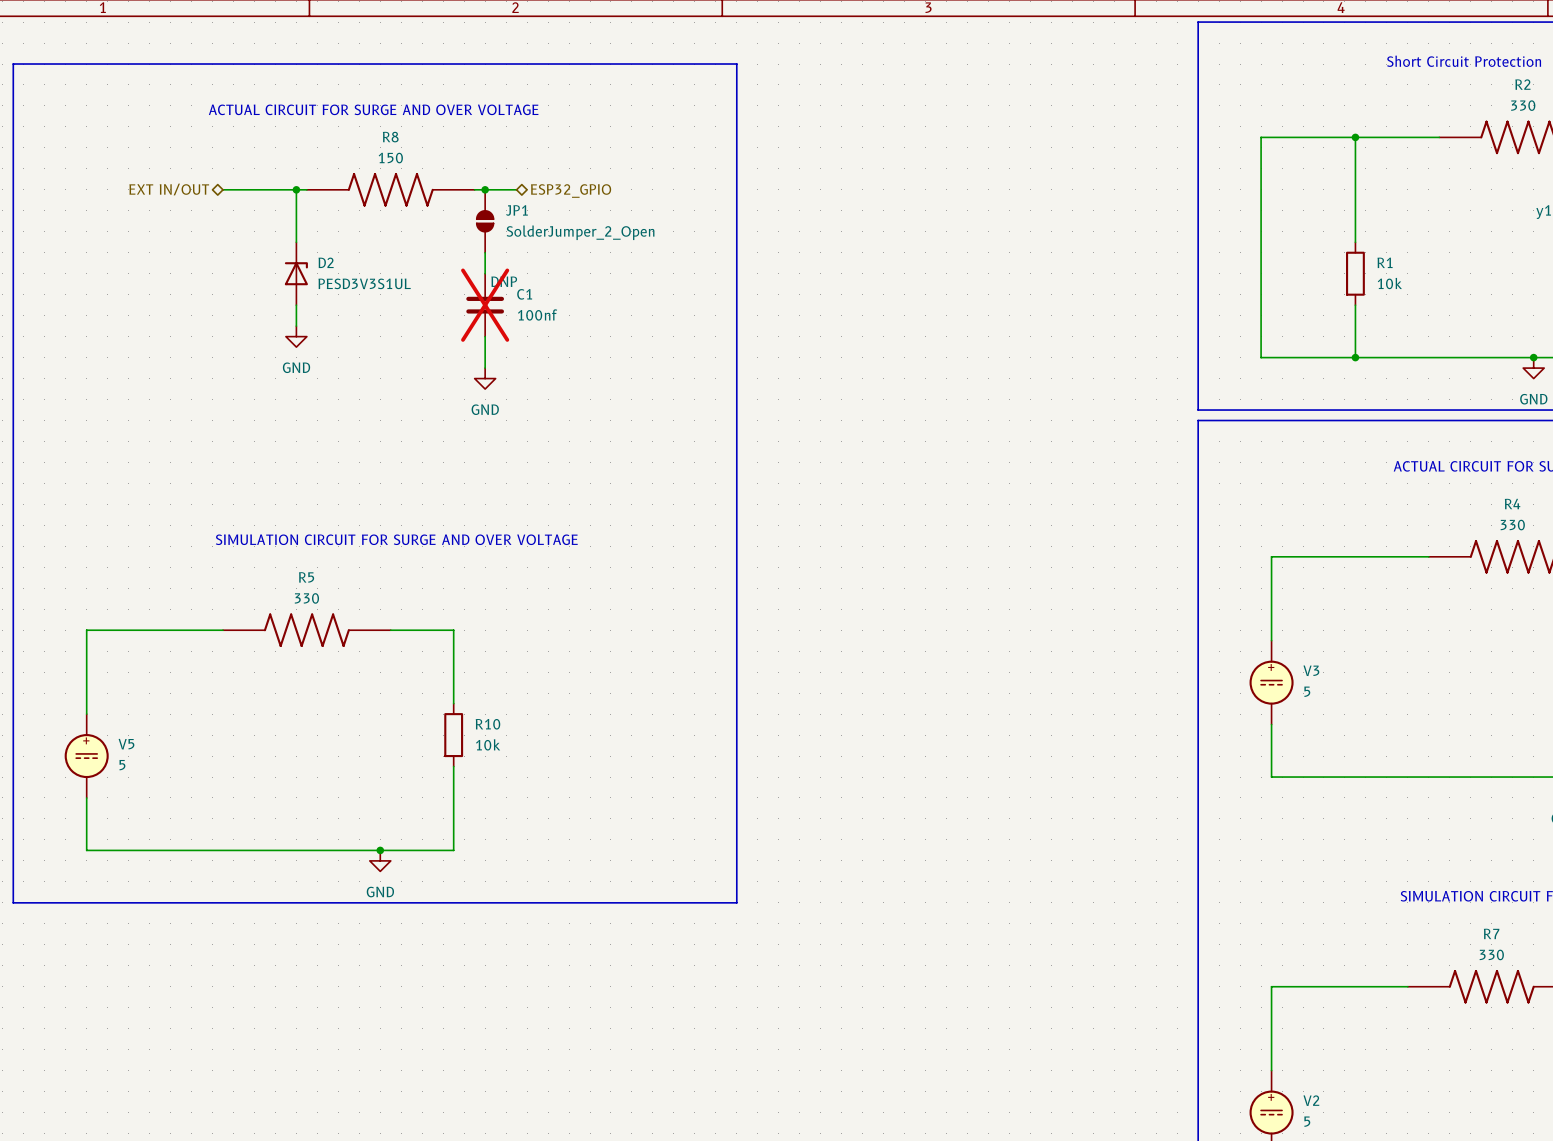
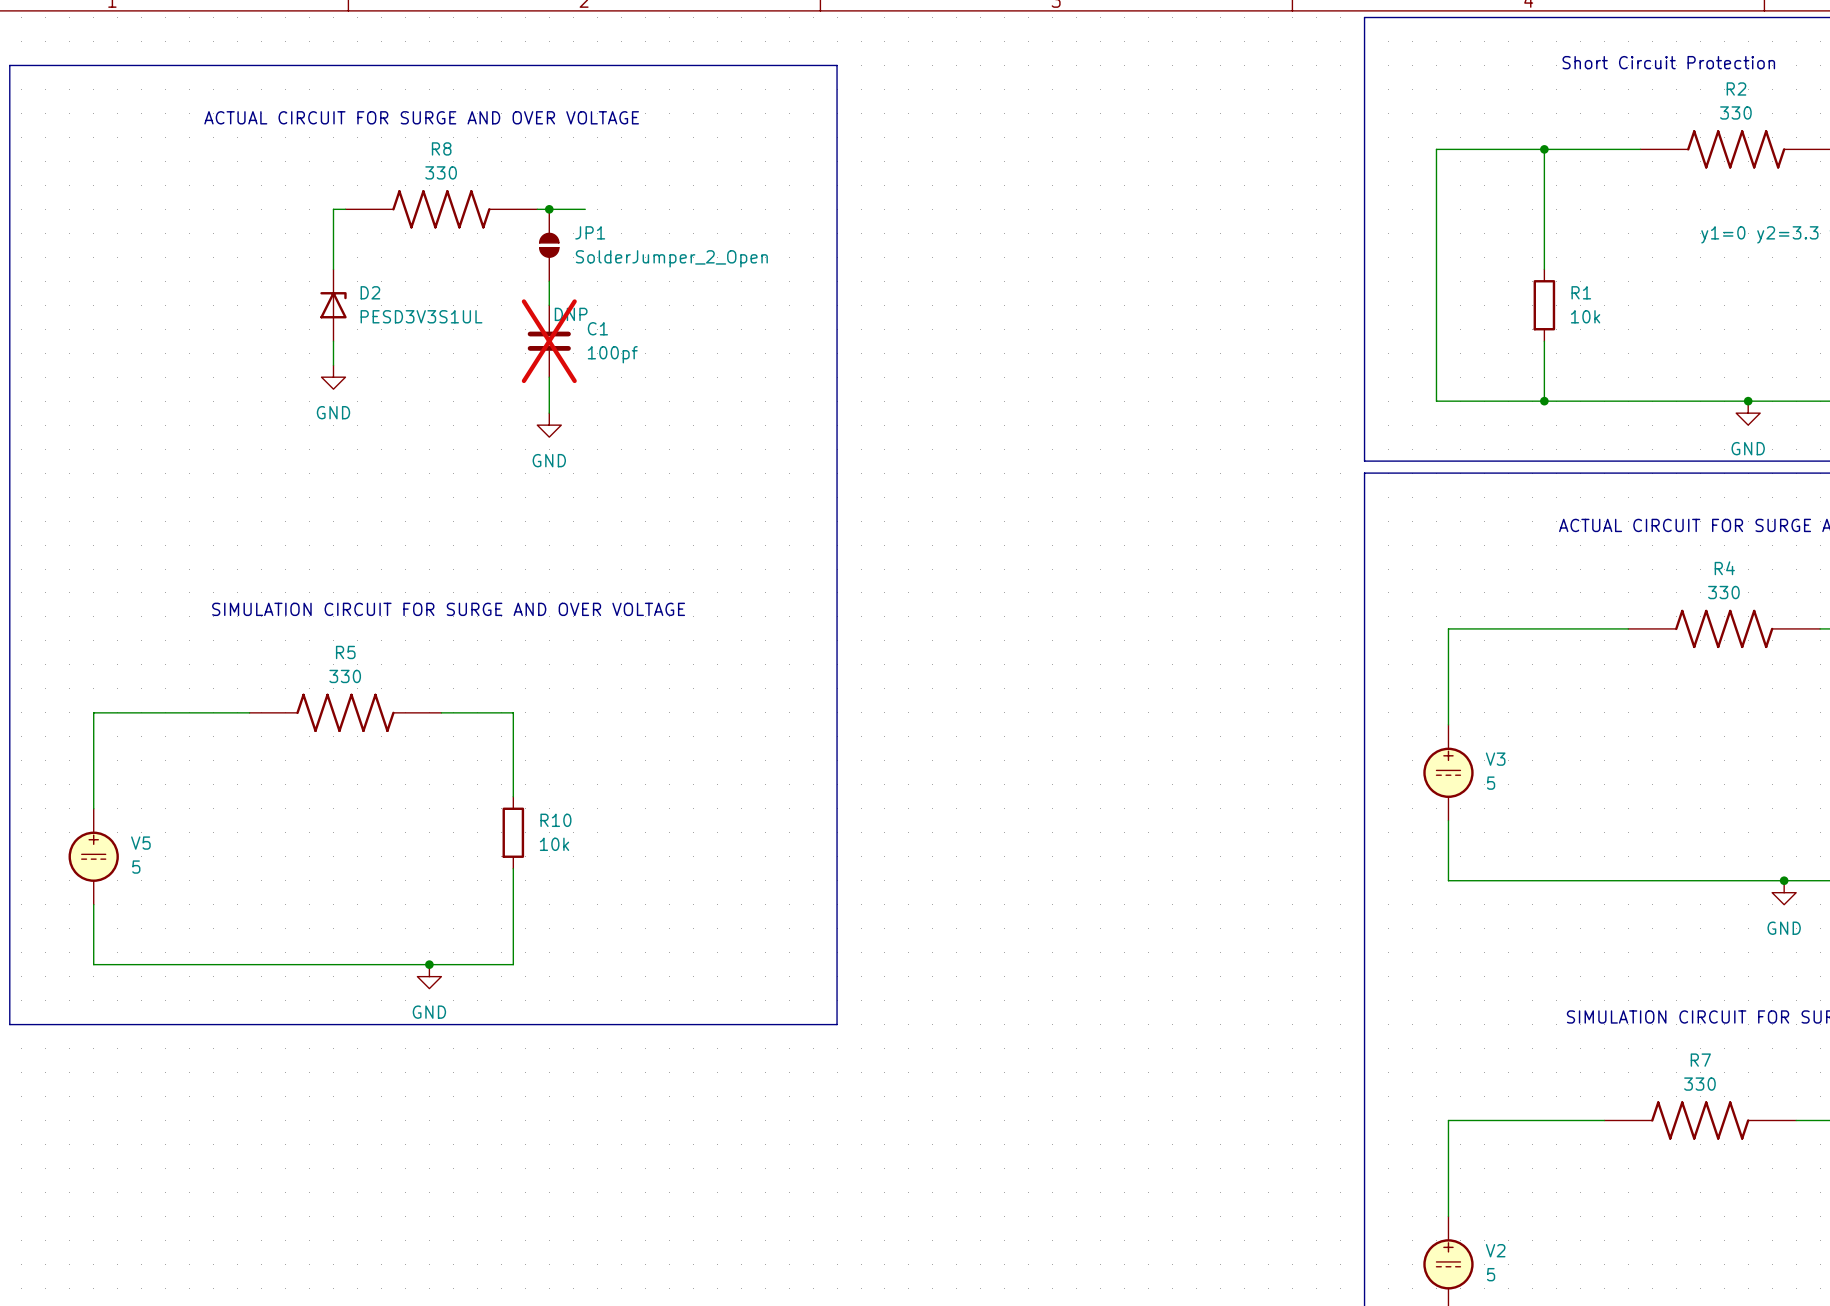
R8 value: 150 (390, 158) -> 330 (441, 172)
hierarchical label: EXT IN/OUT (169, 189) -> none
wire: (223, 189) (296, 189) -> none
junction: (296, 189) -> none
hierarchical label: ESP32_GPIO (571, 191) -> none
C1 value: 100nf (537, 314) -> 100pf (612, 354)

